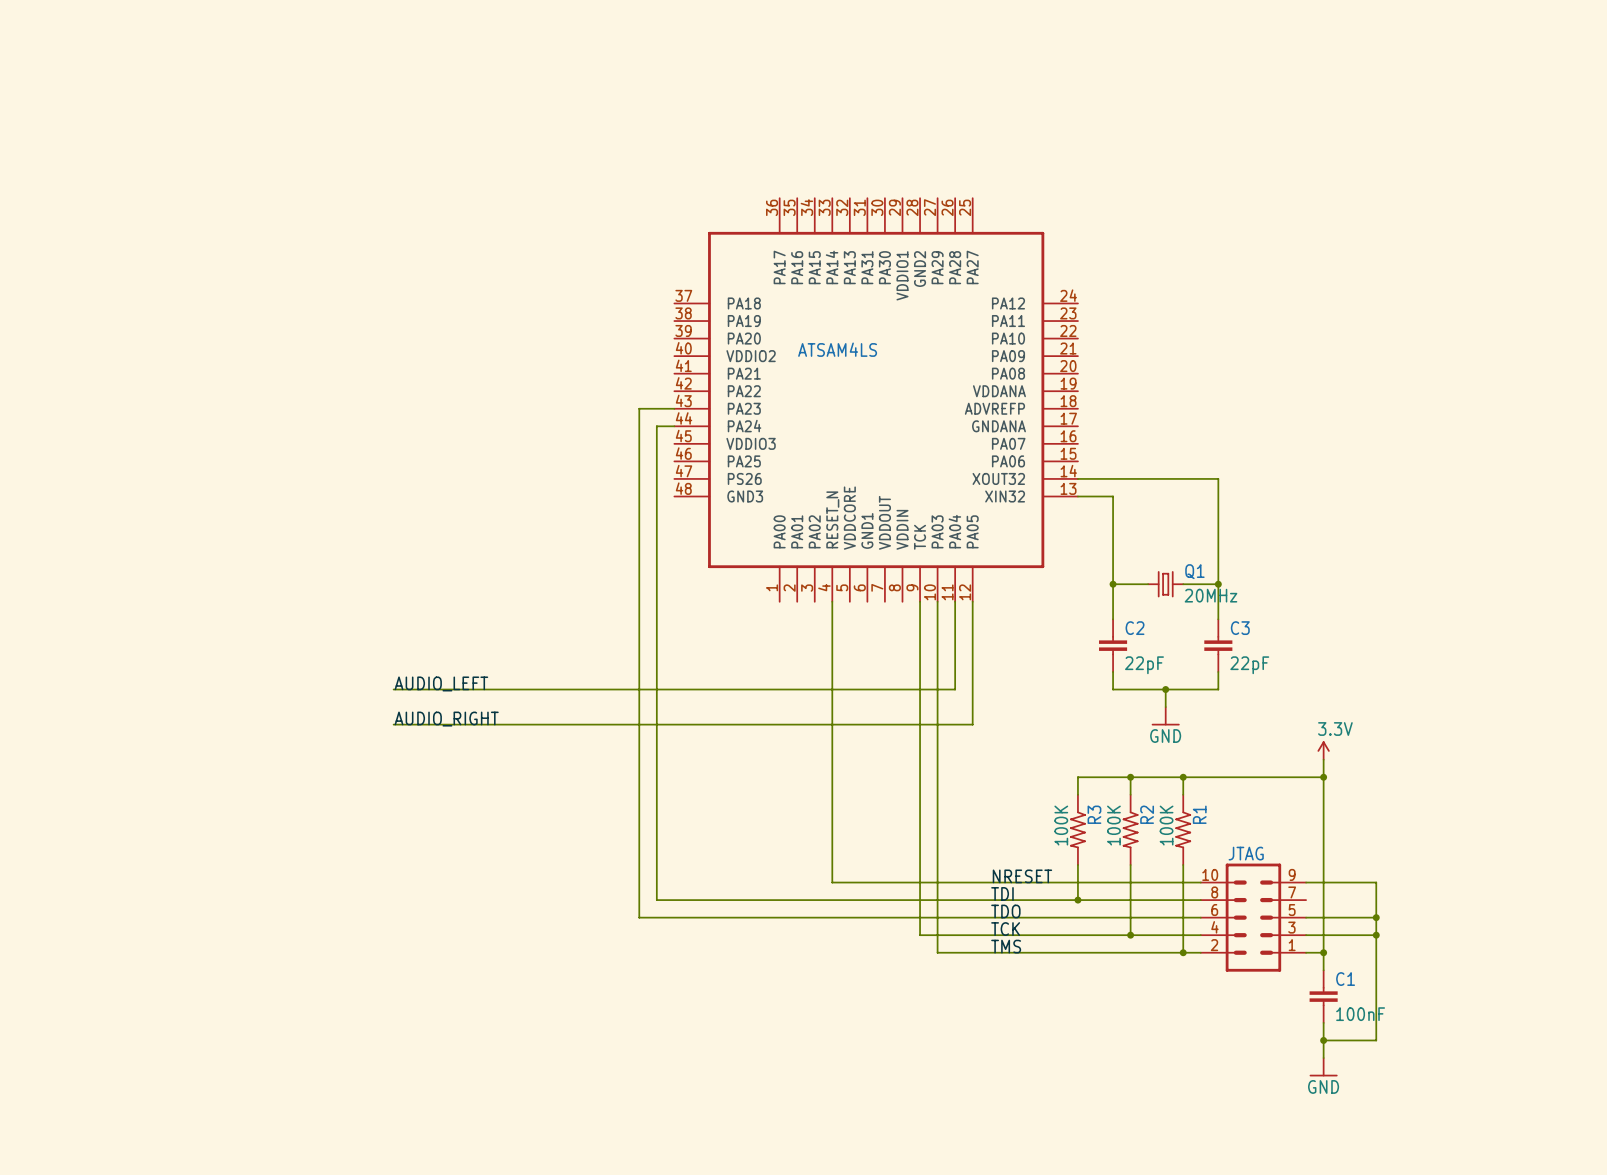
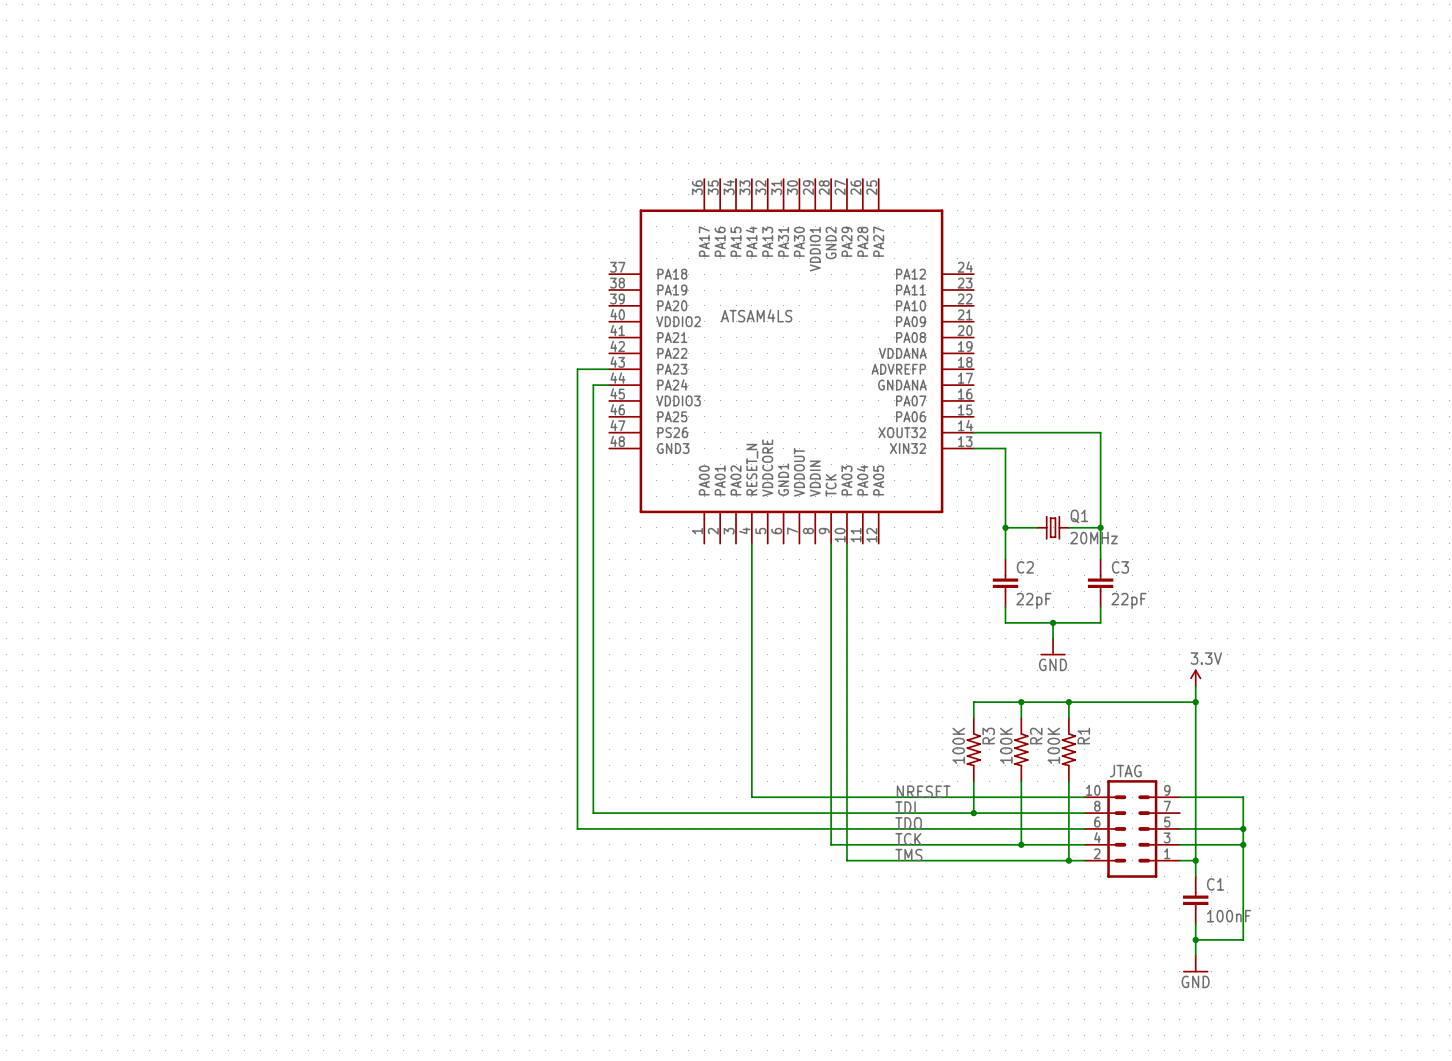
wire: (955, 601) (955, 689) (393, 689) -> none
wire: (972, 601) (972, 724) (393, 724) -> none
label: AUDIO_LEFT (441, 683) -> none
label: AUDIO_RIGHT (446, 719) -> none

